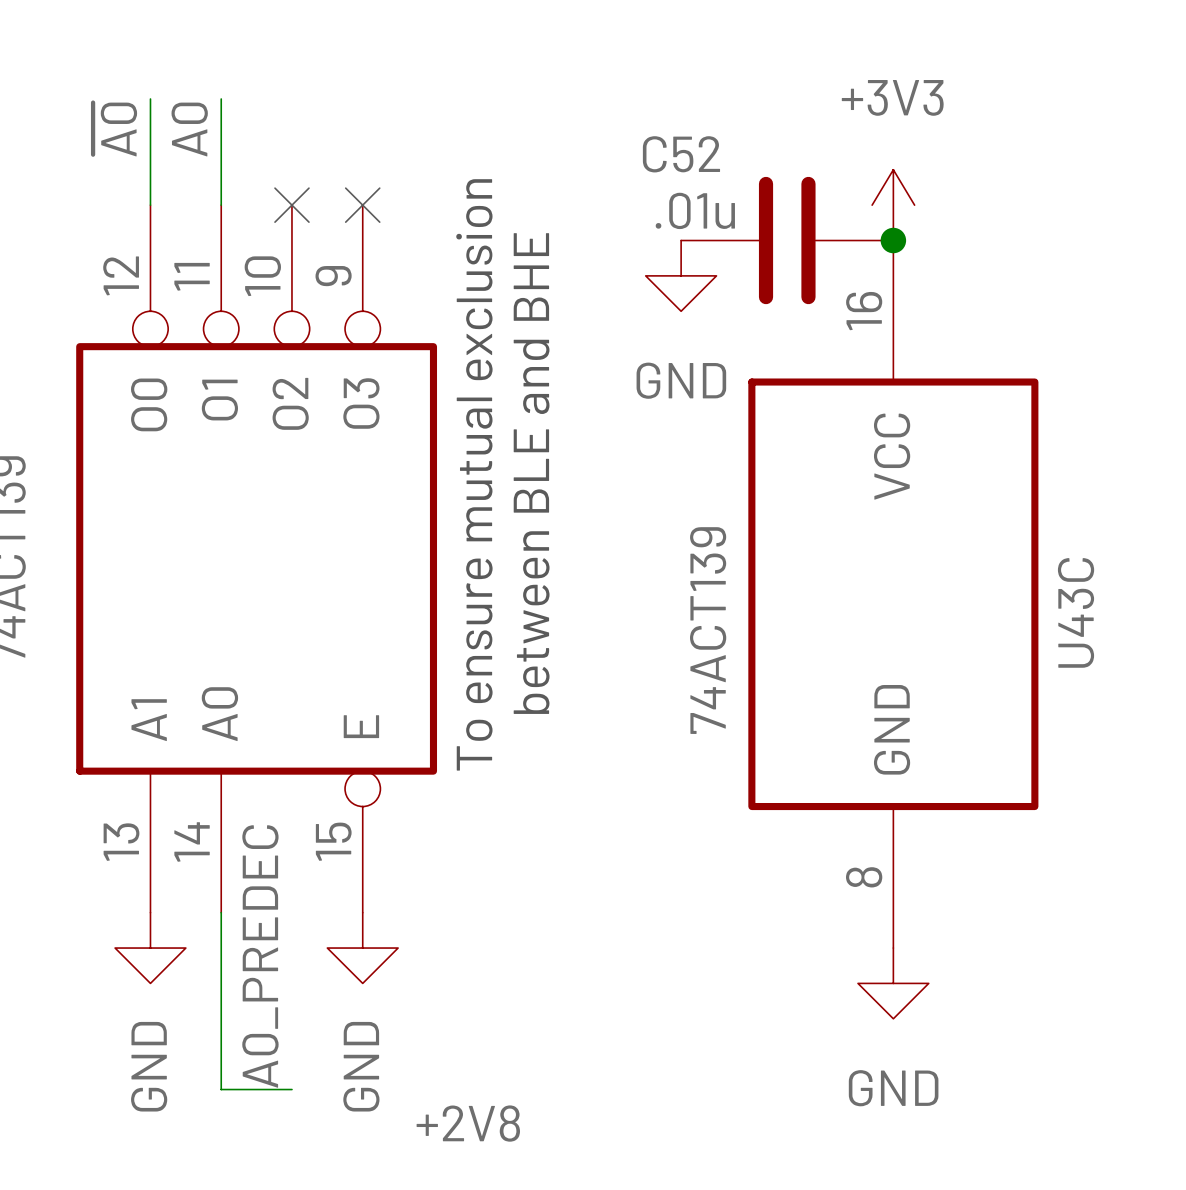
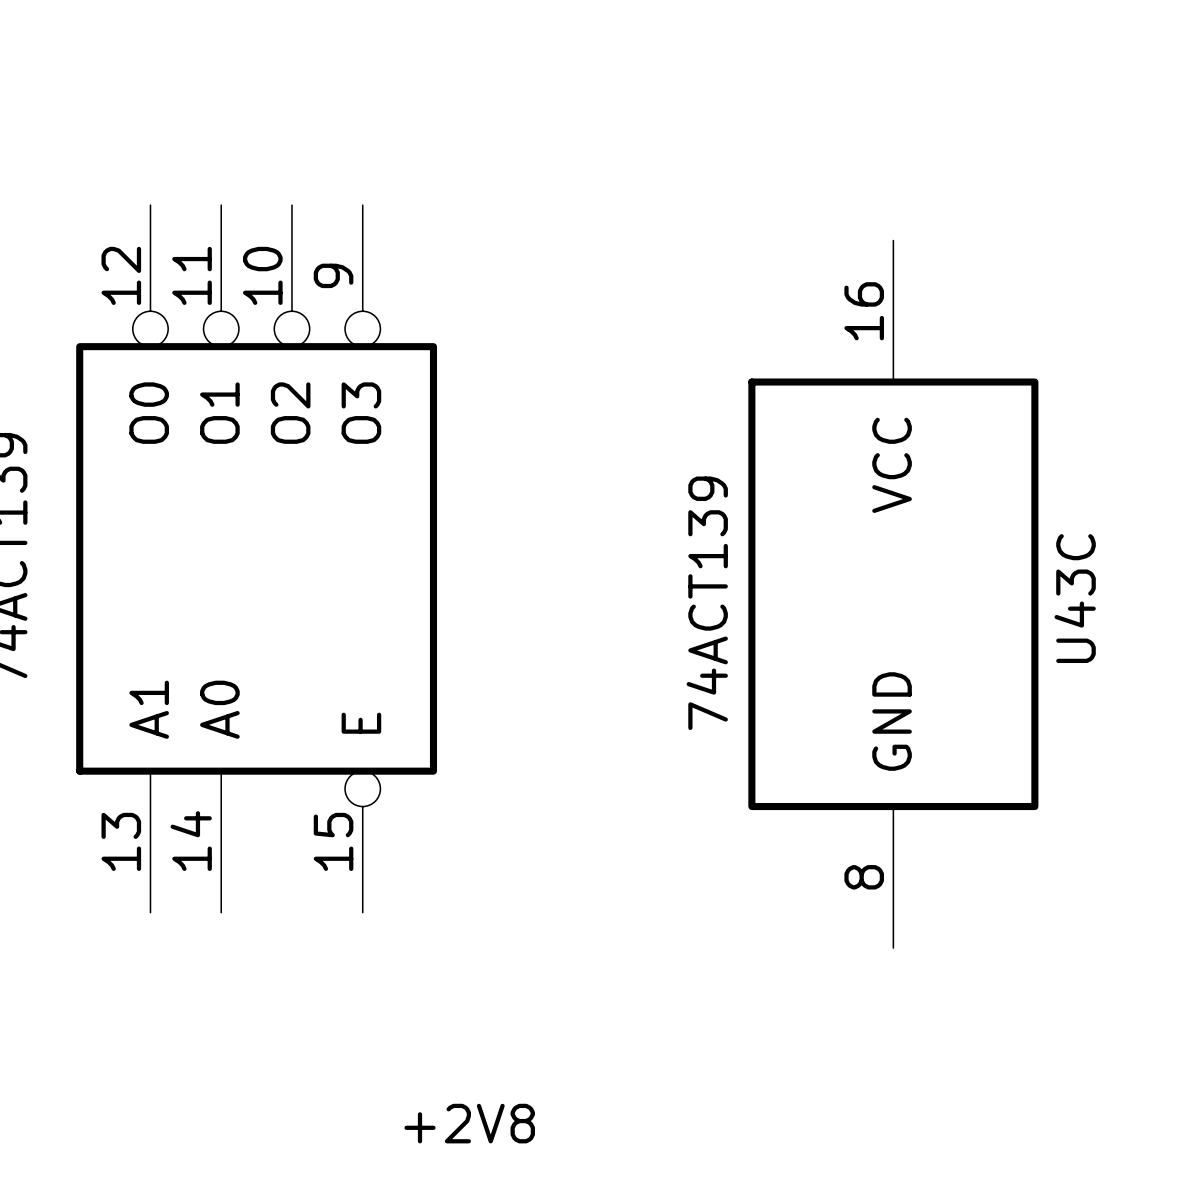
wire: (150, 99) (150, 205) -> none
wire: (221, 99) (221, 205) -> none
label: ~{A0} (115, 129) -> none
label: A0 (189, 129) -> none
no-connect mark: (291, 205) -> none
no-connect mark: (362, 205) -> none
power symbol: +3V3 (893, 205) -> none
C52: .01u (787, 240) -> none
junction: (893, 240) -> none
power symbol: GND (681, 275) -> none
text: between BLE and BHE (531, 473) -> none
text: To ensure mutual exclusion (474, 474) -> none
wire: (221, 912) (221, 1089) (291, 1089) -> none
power symbol: GND (150, 948) -> none
power symbol: GND (362, 948) -> none
label: A0_PREDEC (260, 956) -> none
power symbol: GND (893, 983) -> none

